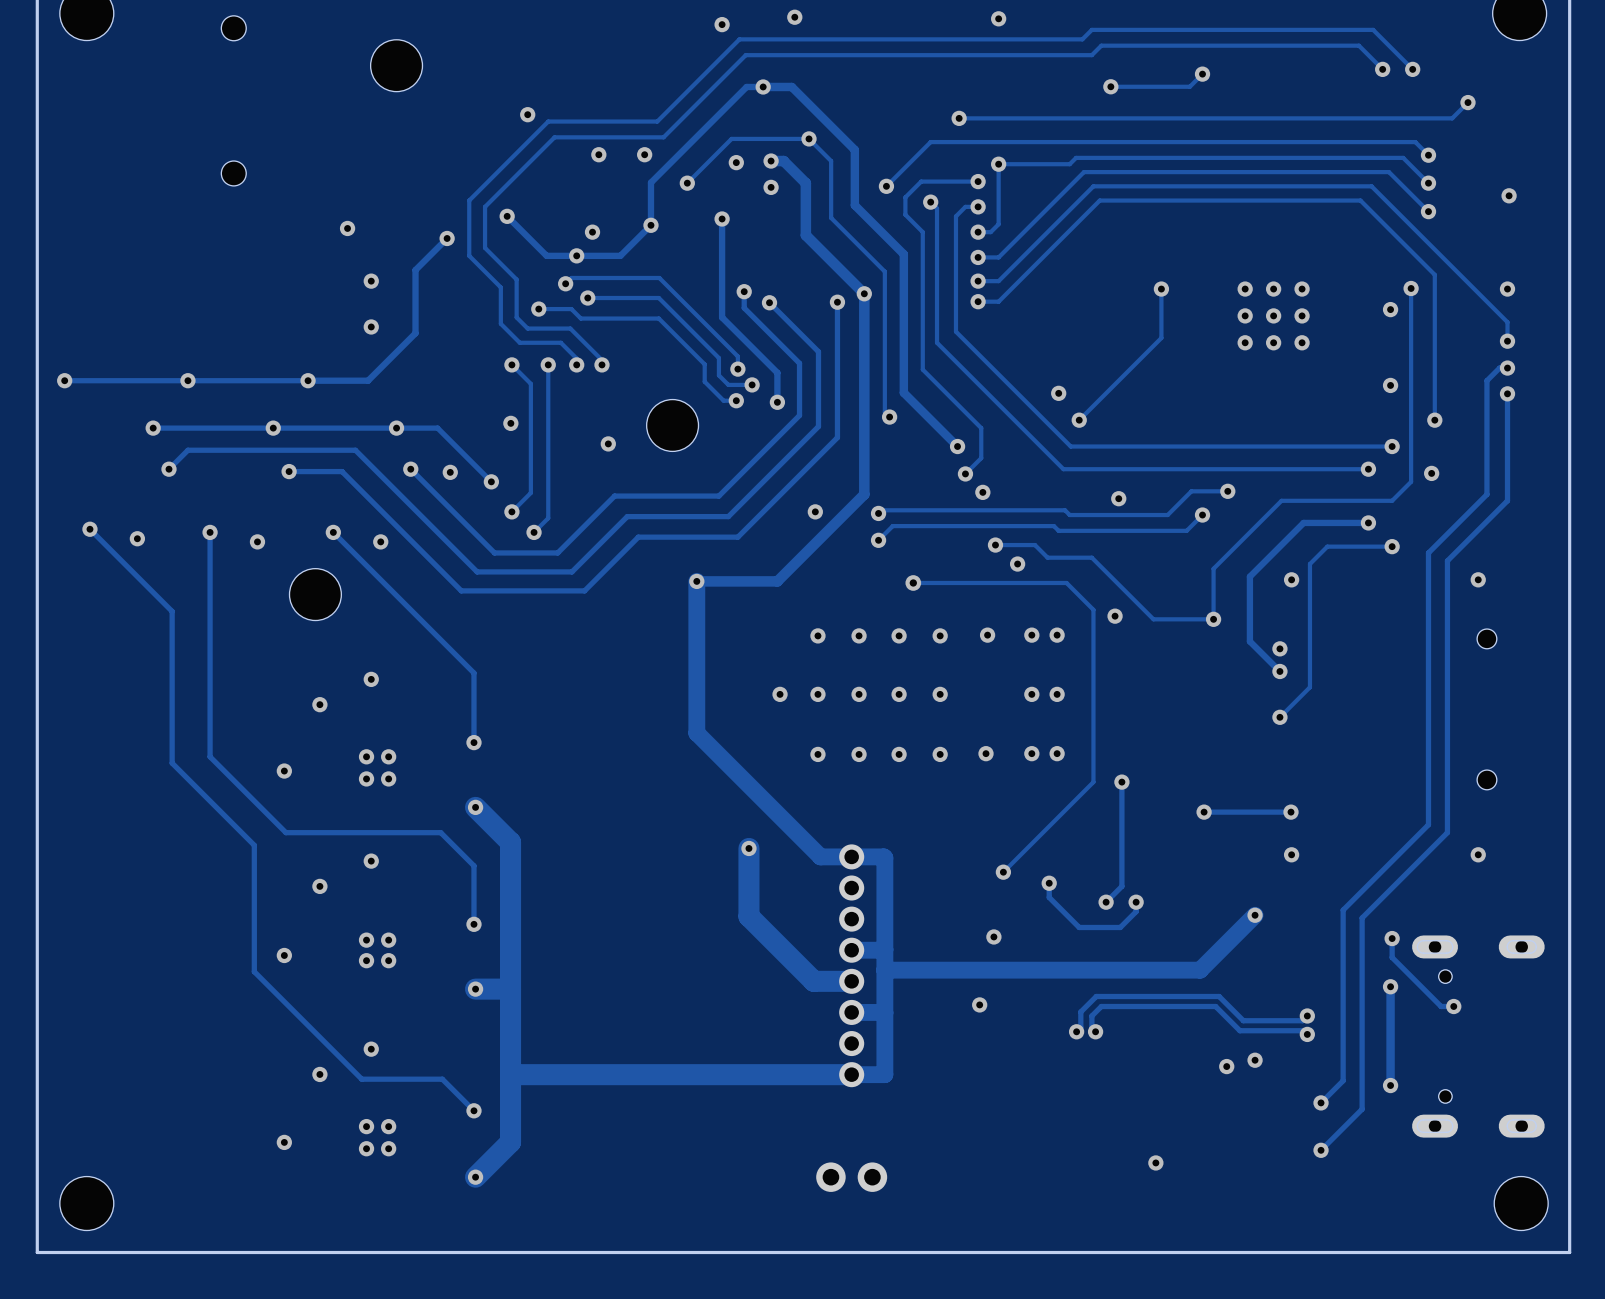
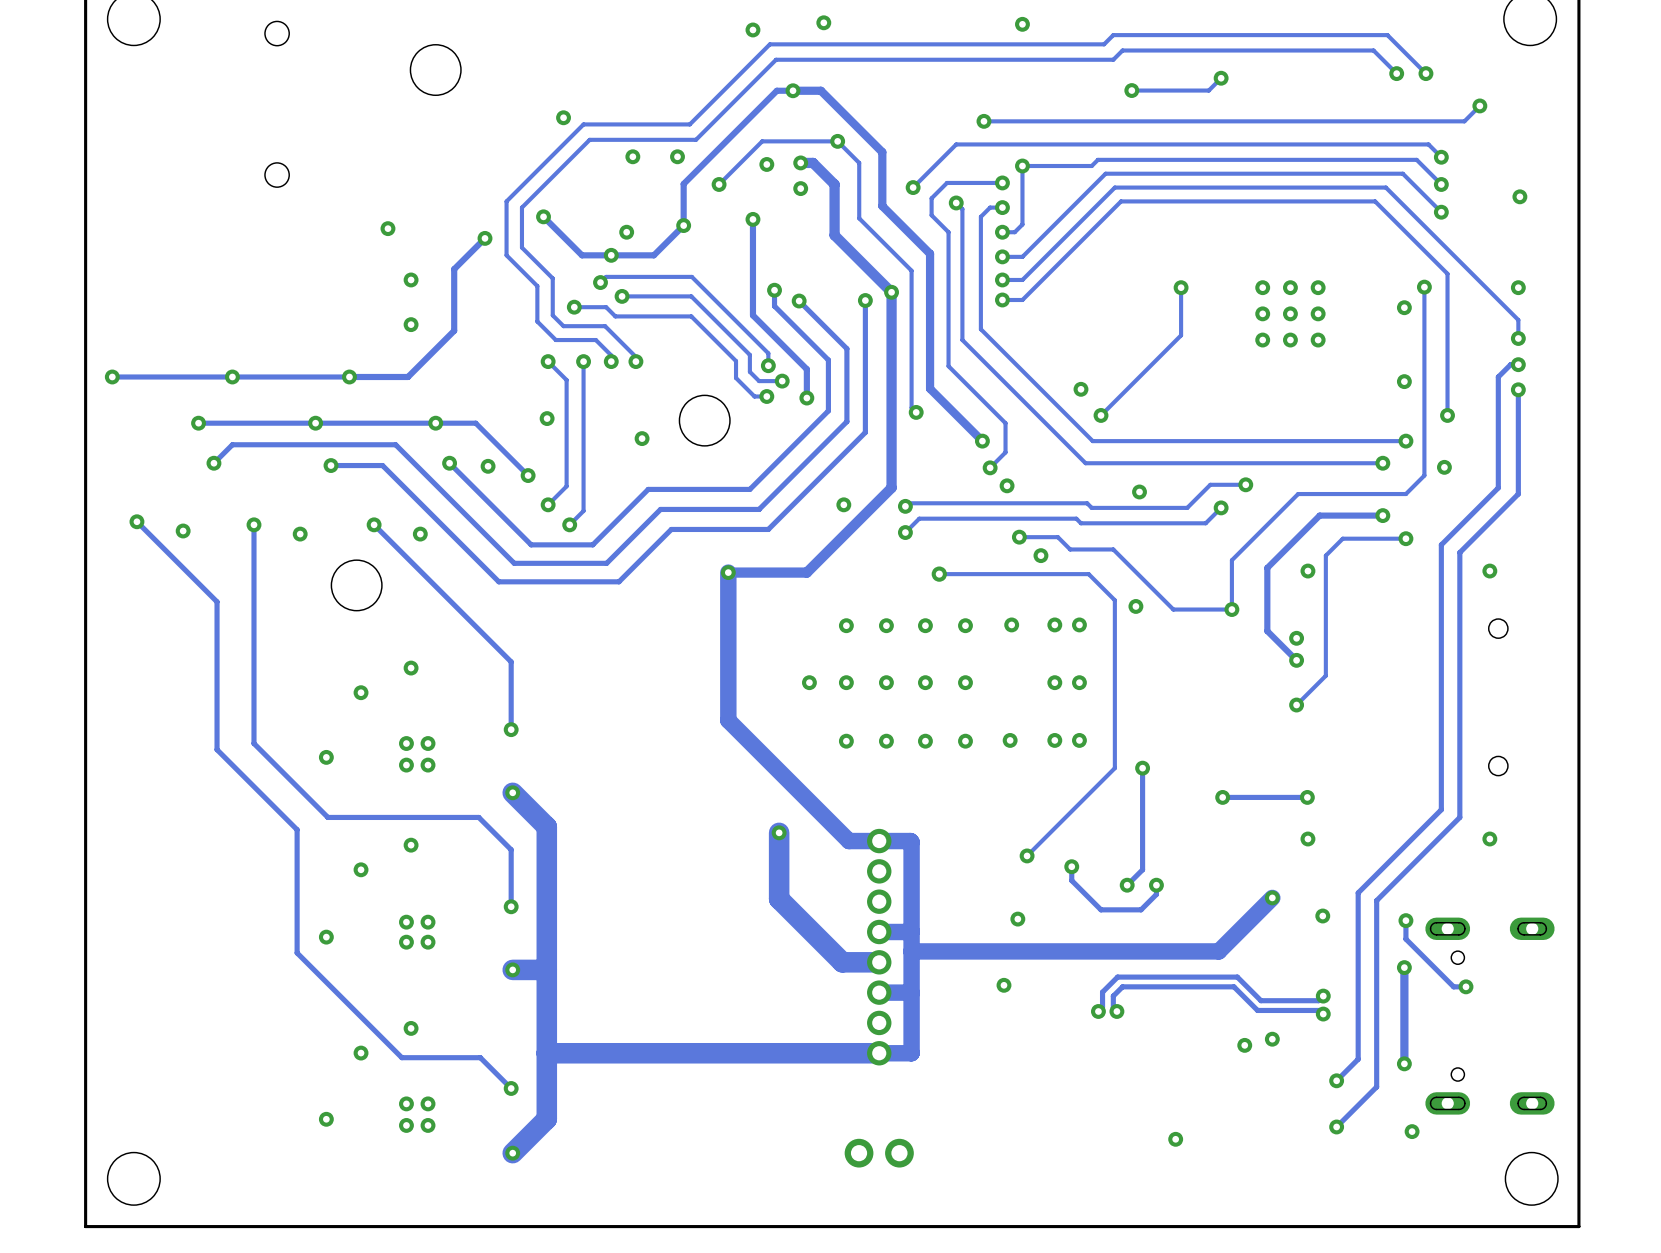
via: none -> (1322, 916)
via: none -> (1412, 1131)

